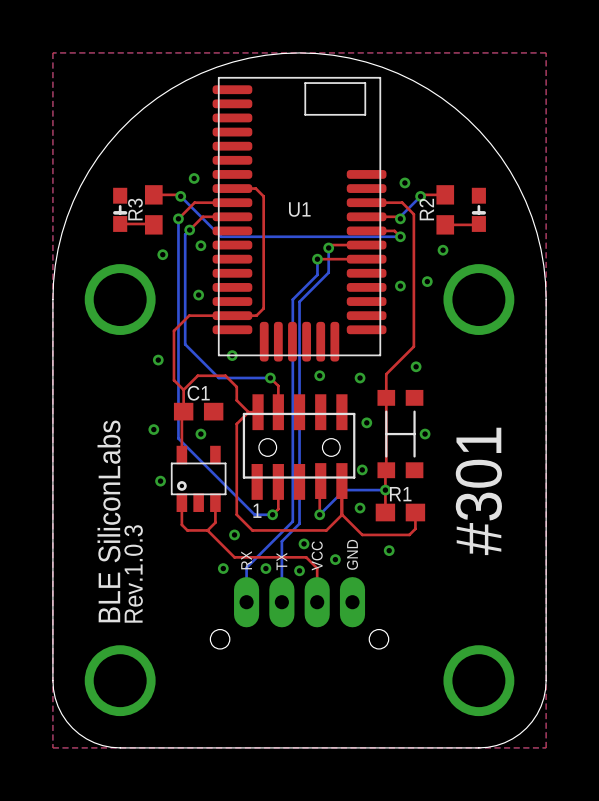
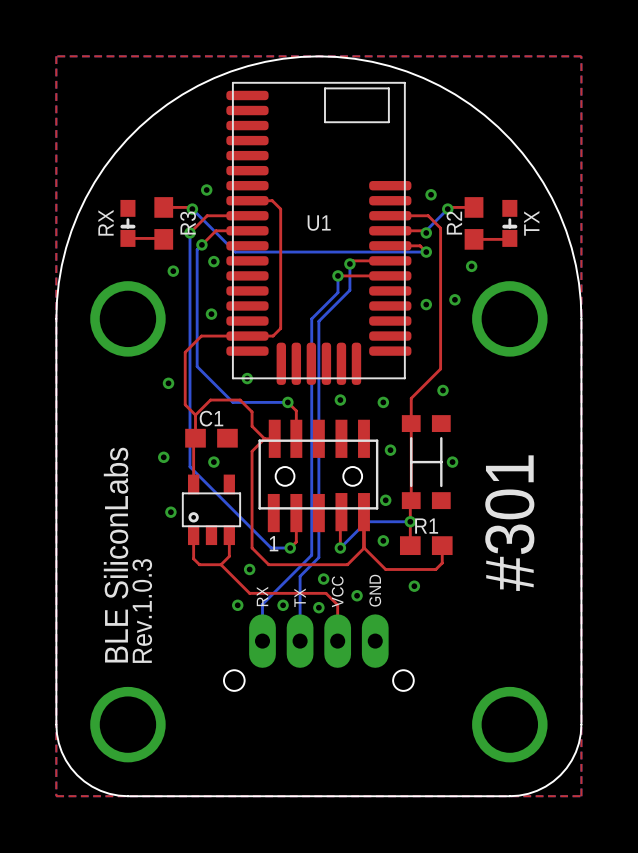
text: none -> RX (105, 222)
R3 name position: R3 (135, 209) -> R3 (188, 223)
text: none -> TX (531, 223)

